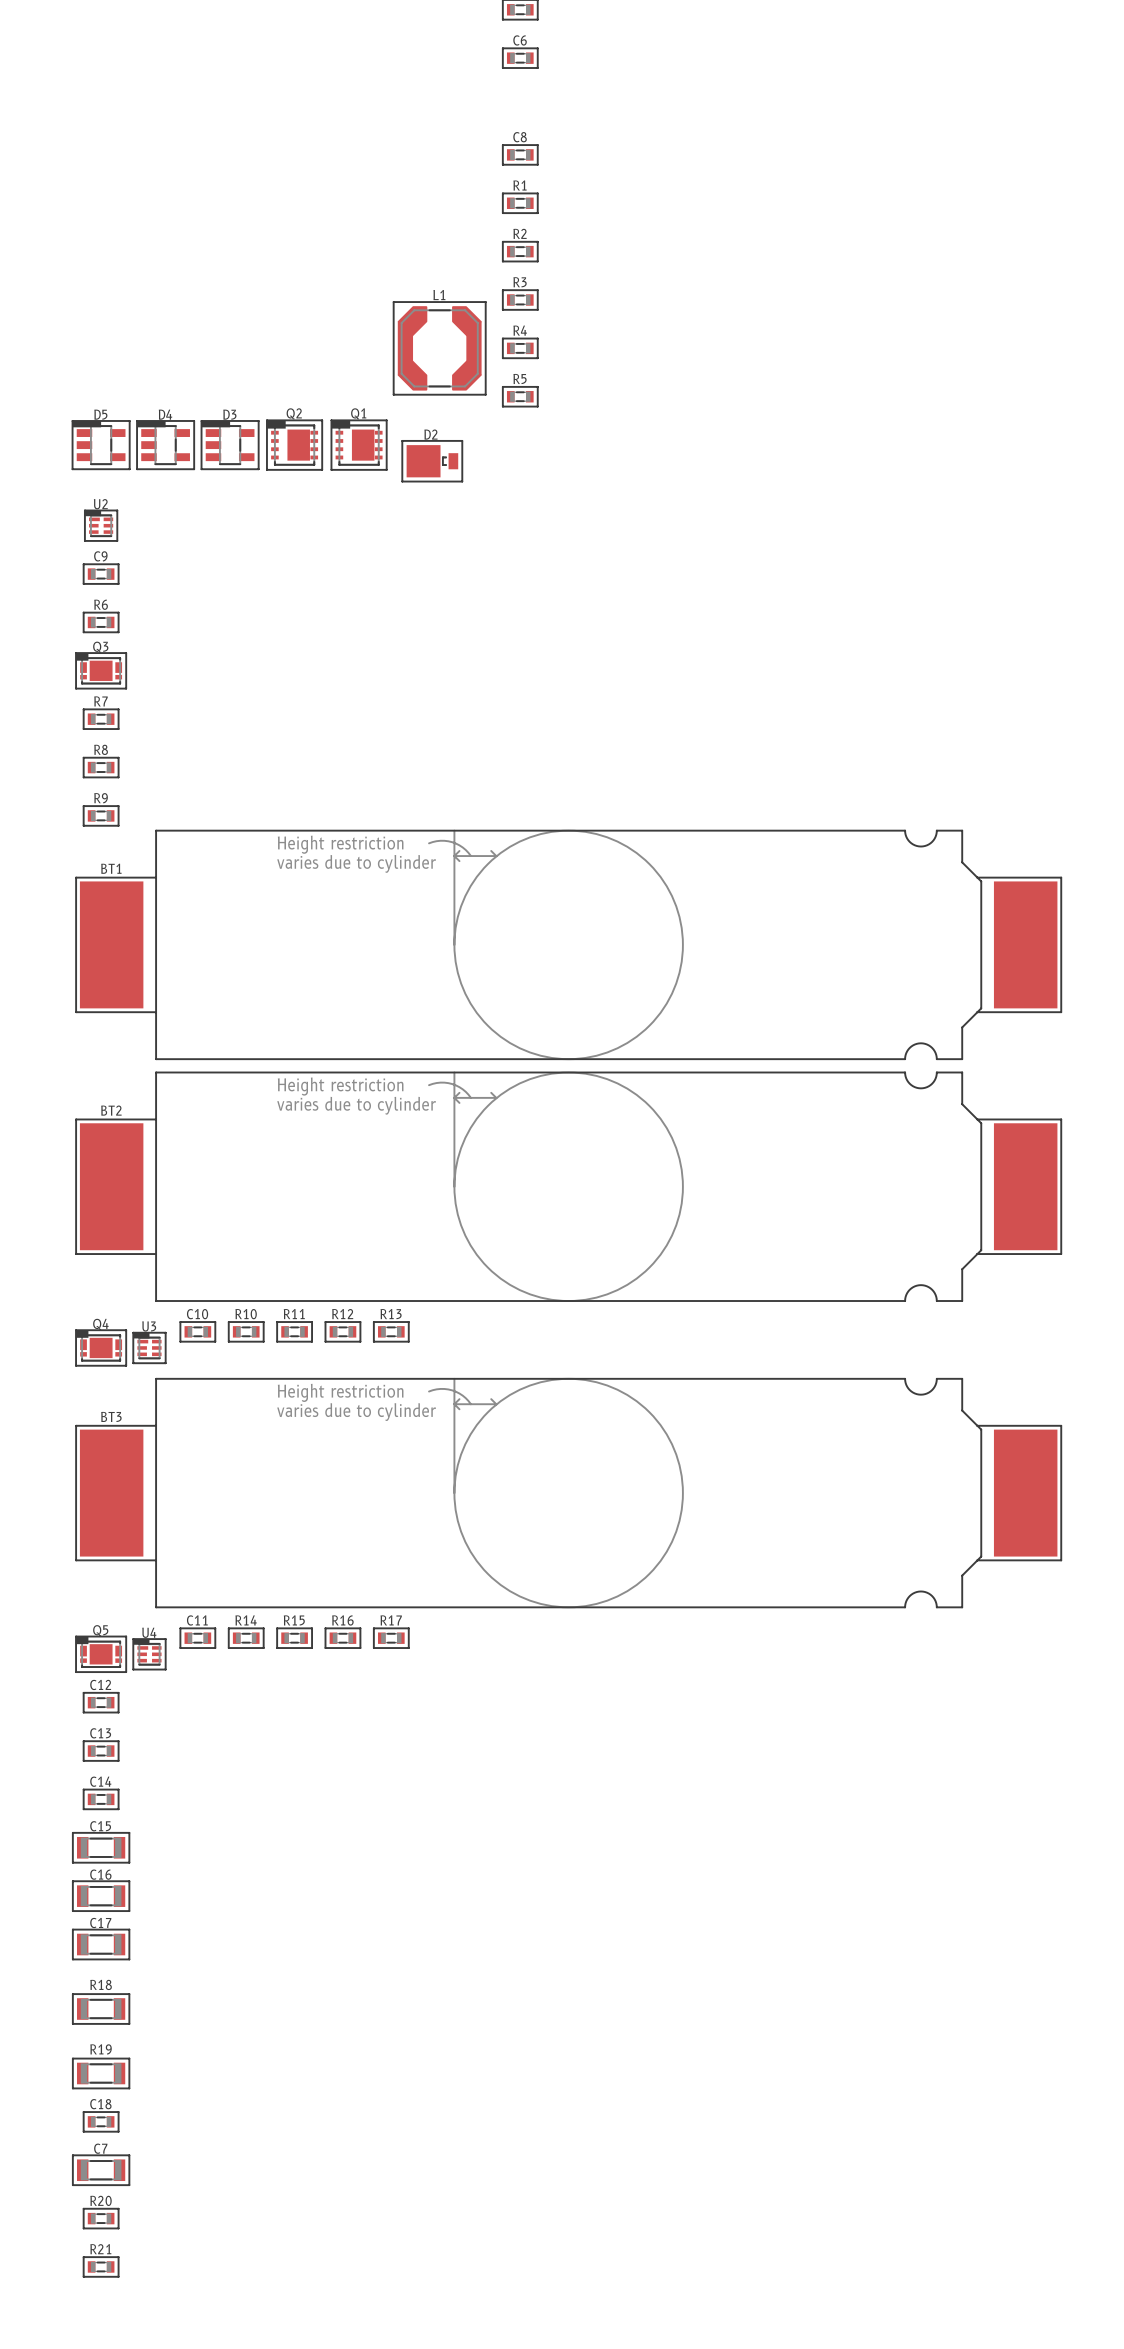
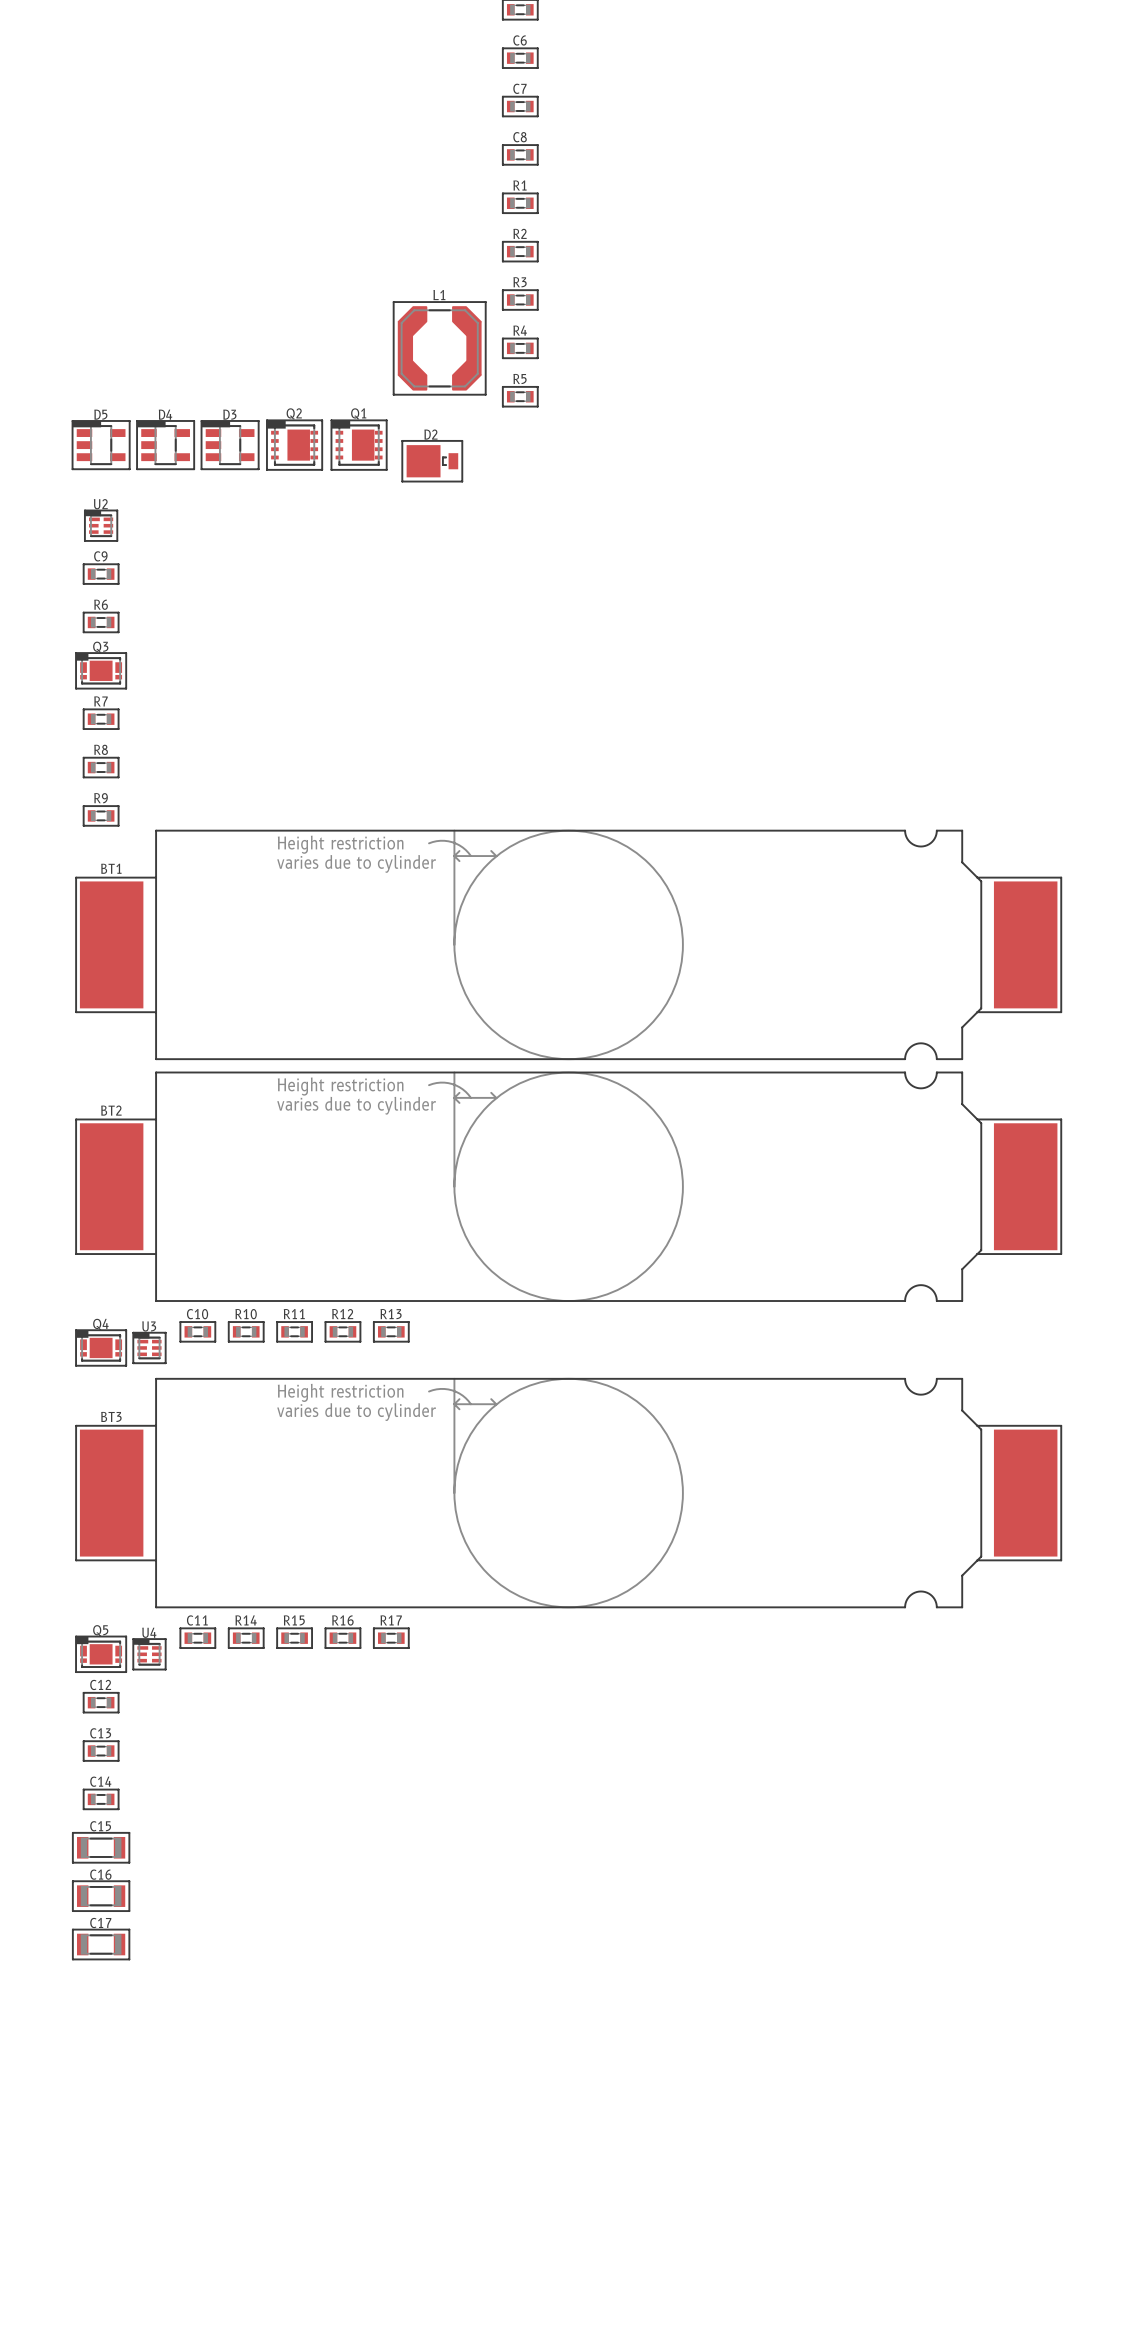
R18: (101, 2009) -> none
R19: (101, 2073) -> none
C18: (101, 2121) -> none
C7 footprint: [71, 2154, 131, 2187] -> [501, 95, 539, 118]
R20: (101, 2218) -> none
R21: (101, 2266) -> none

